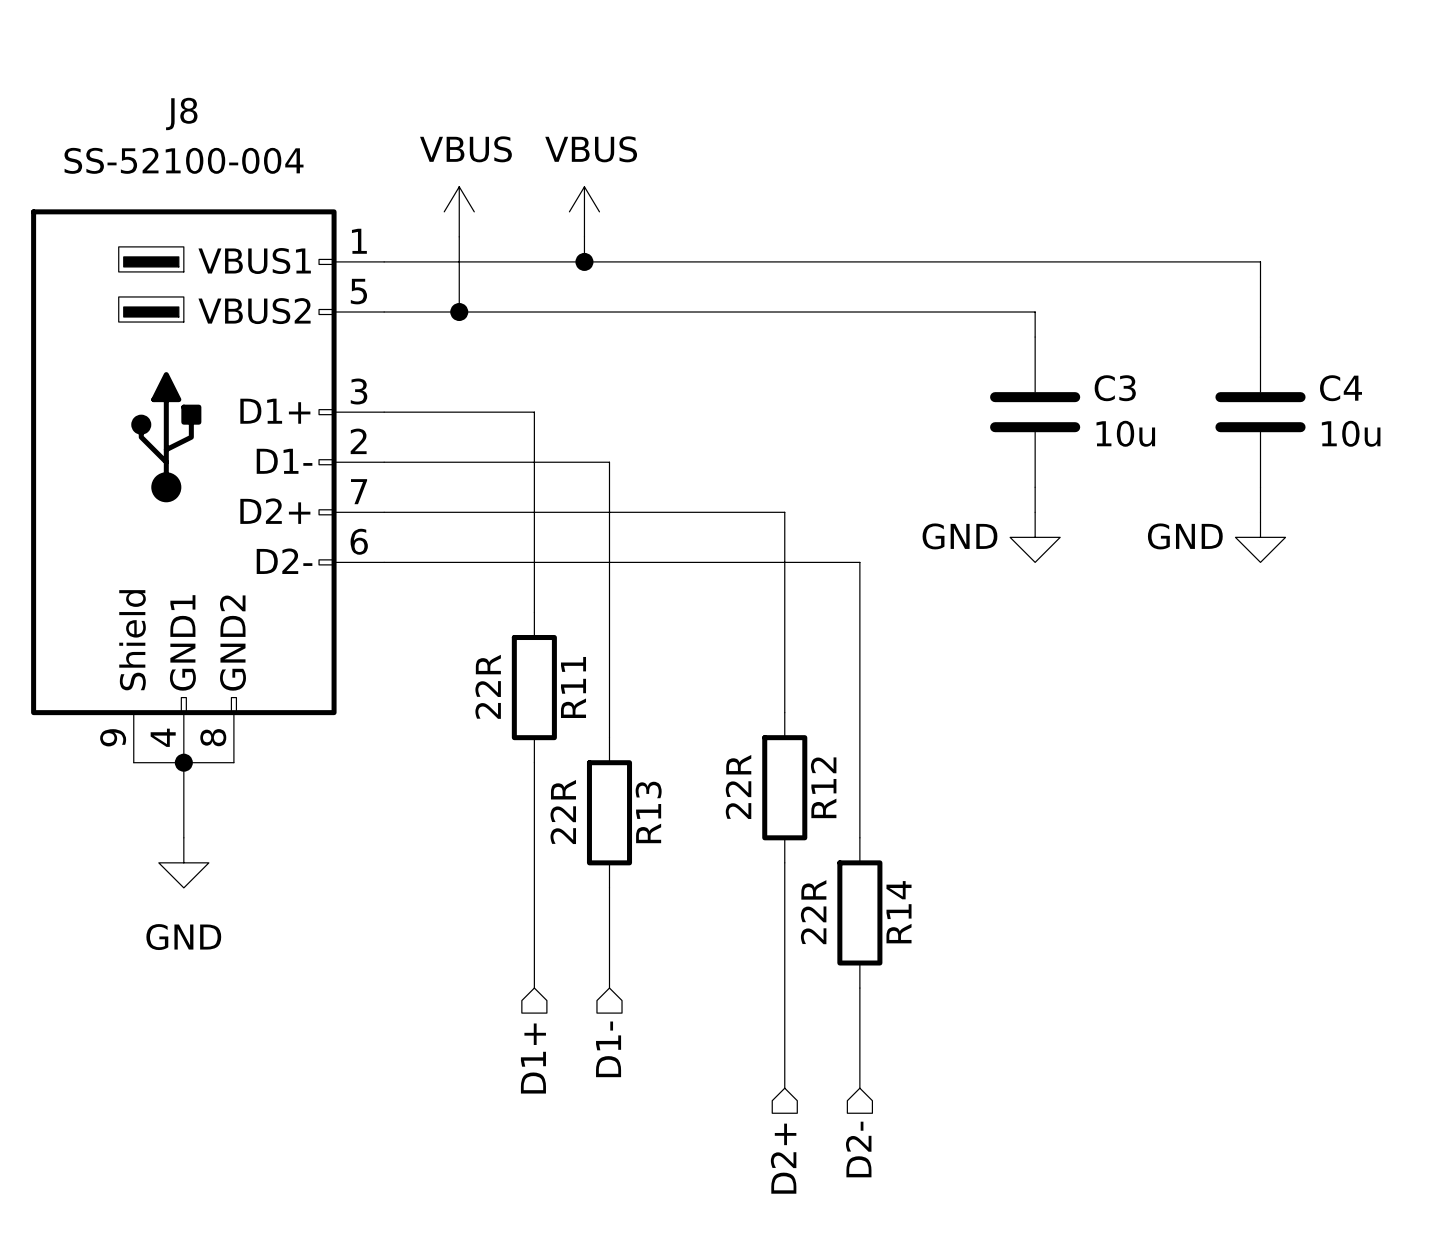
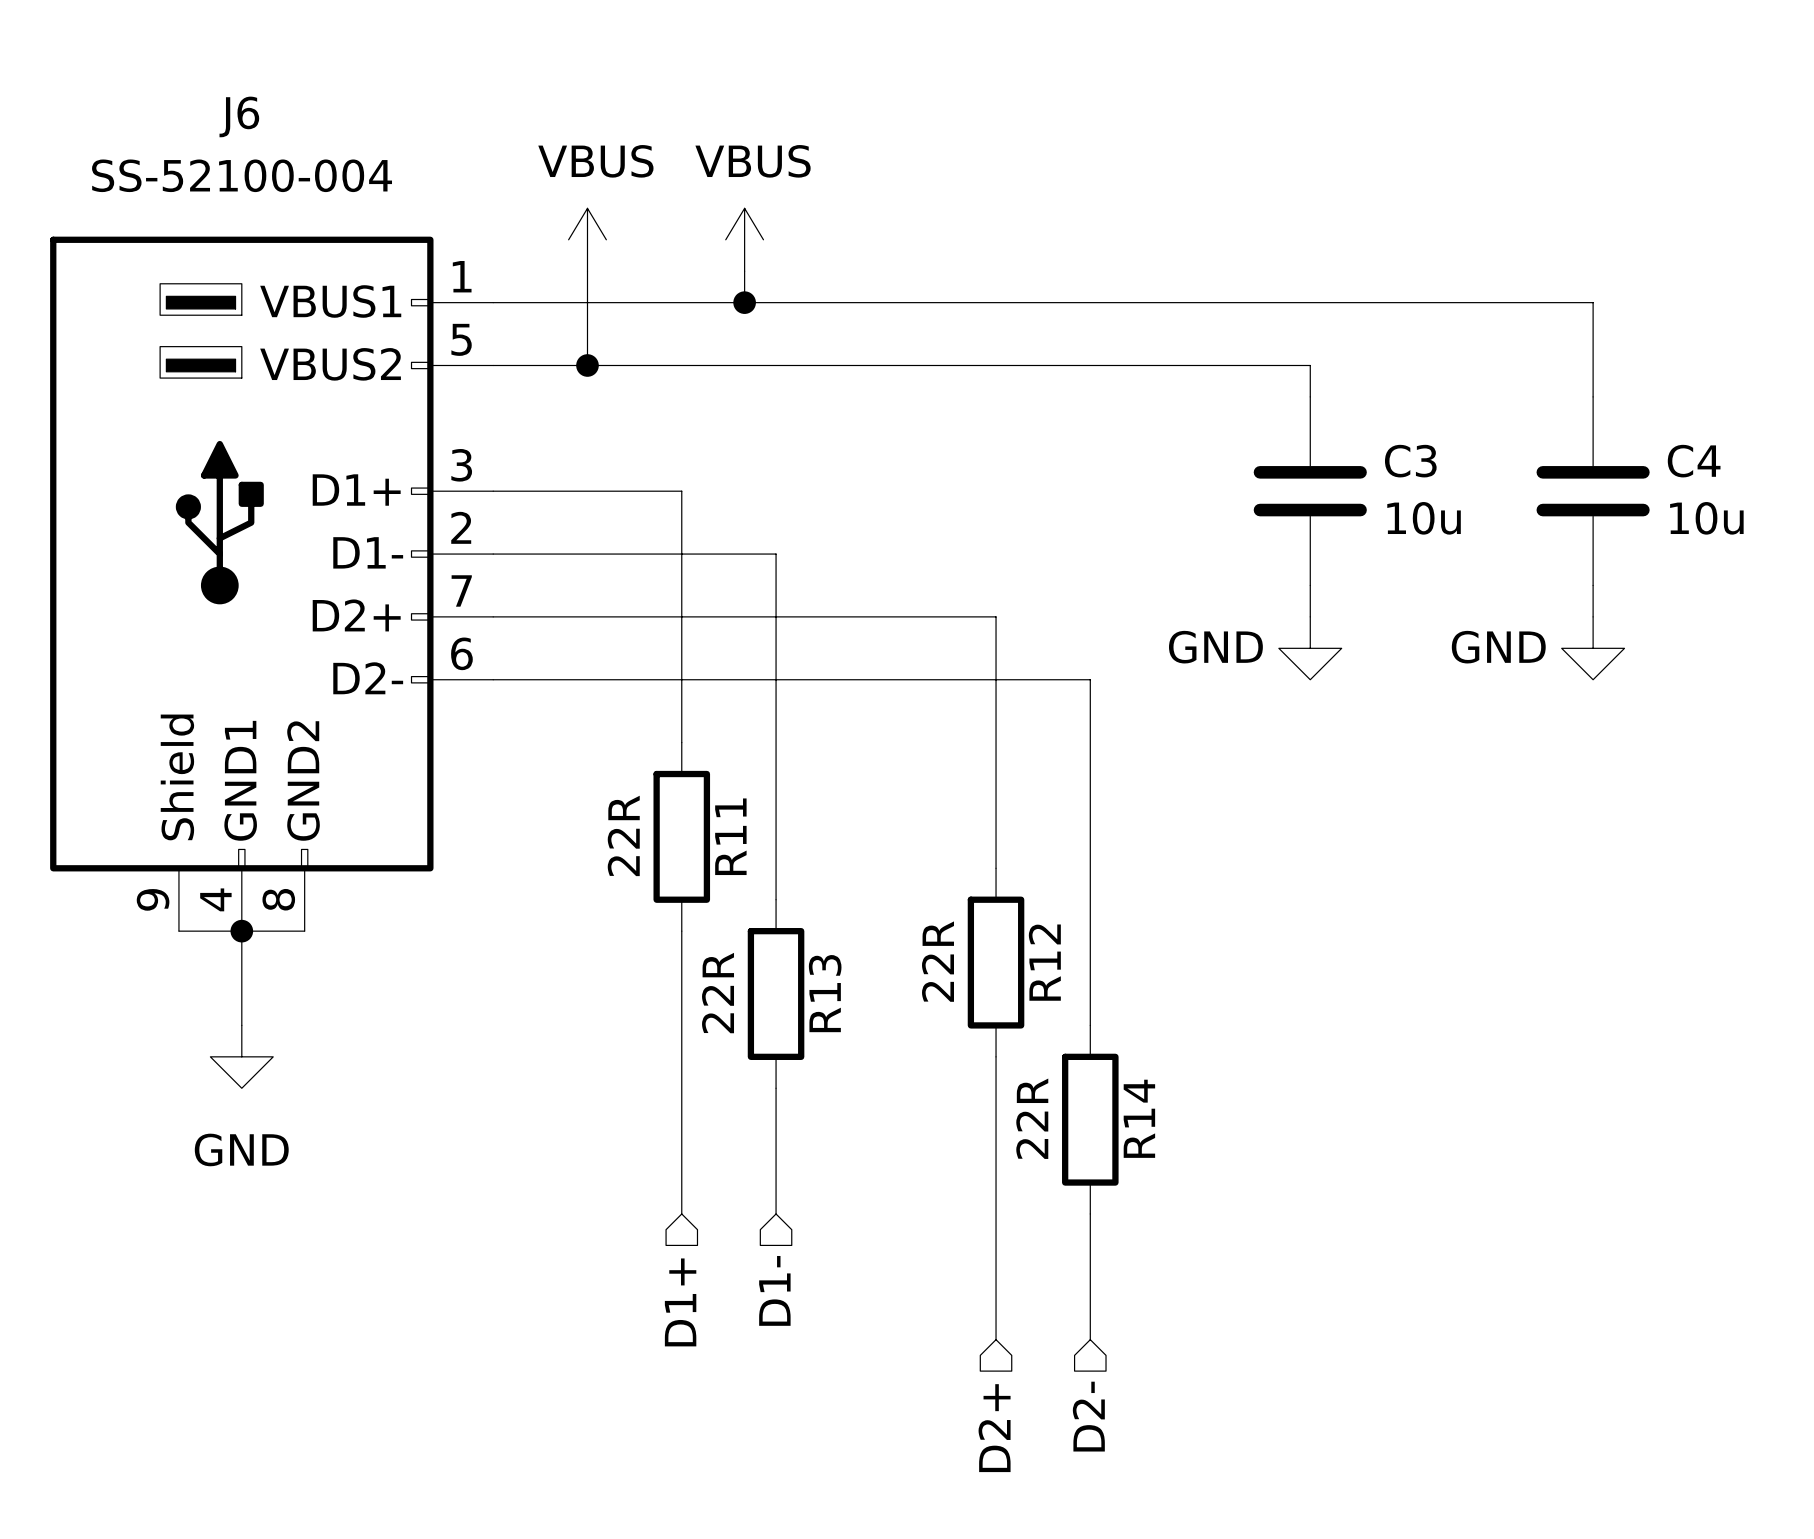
J8 name: J8 (181, 113) -> J6 (239, 116)

